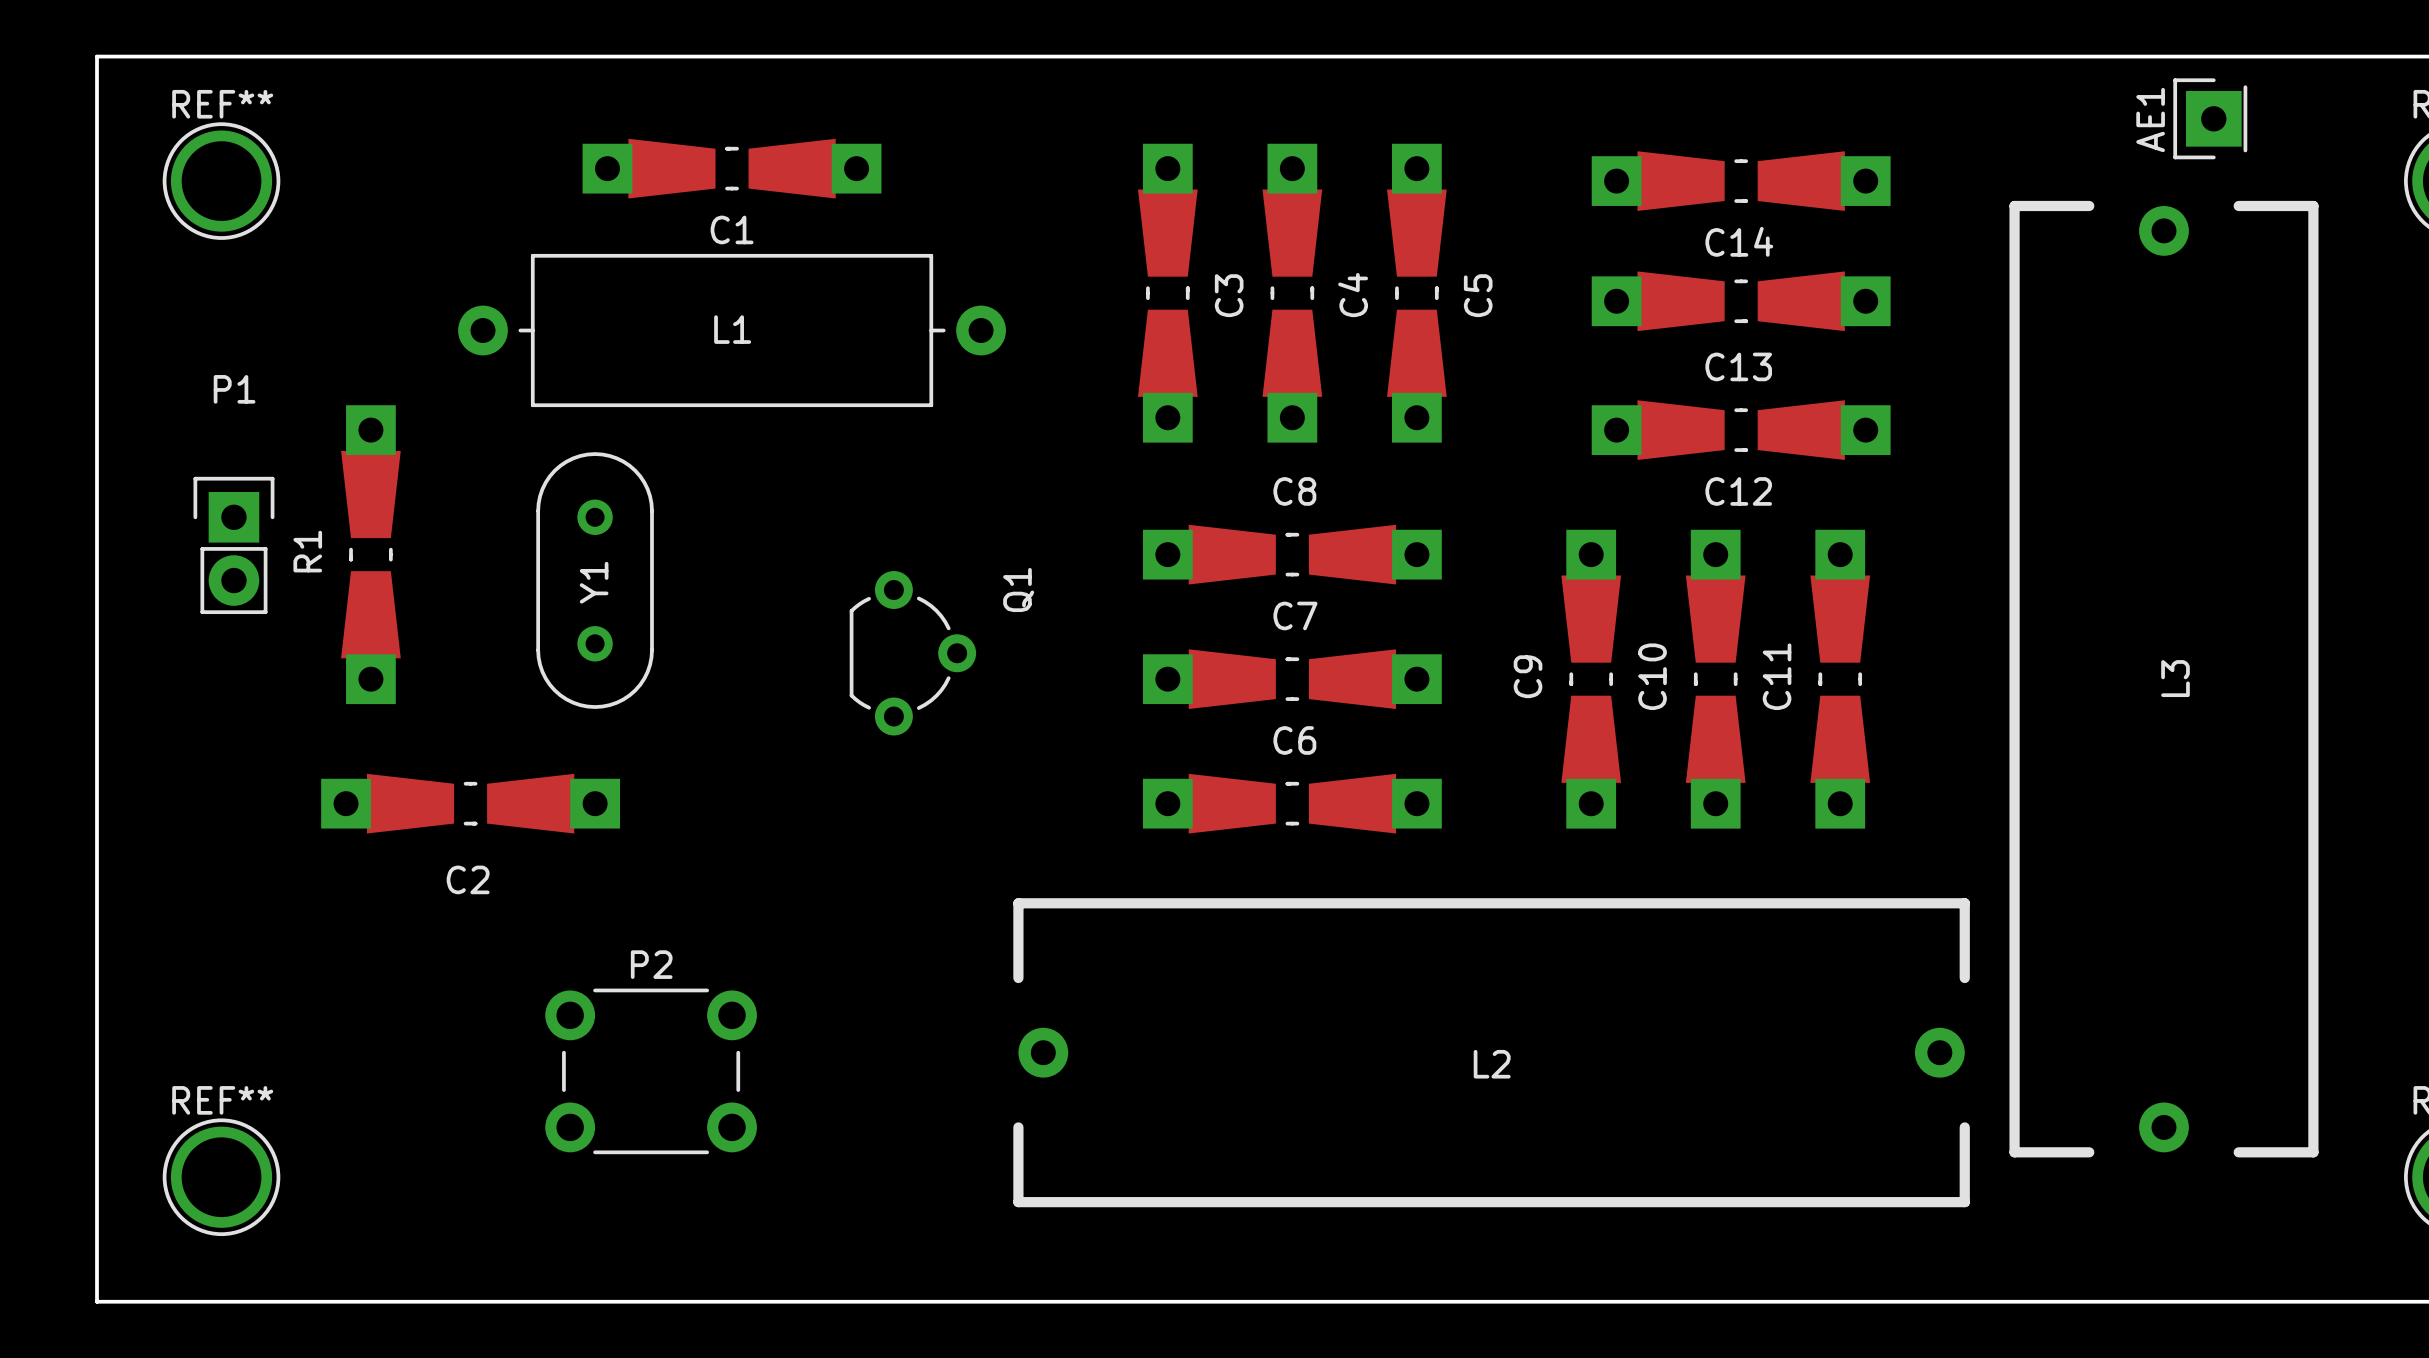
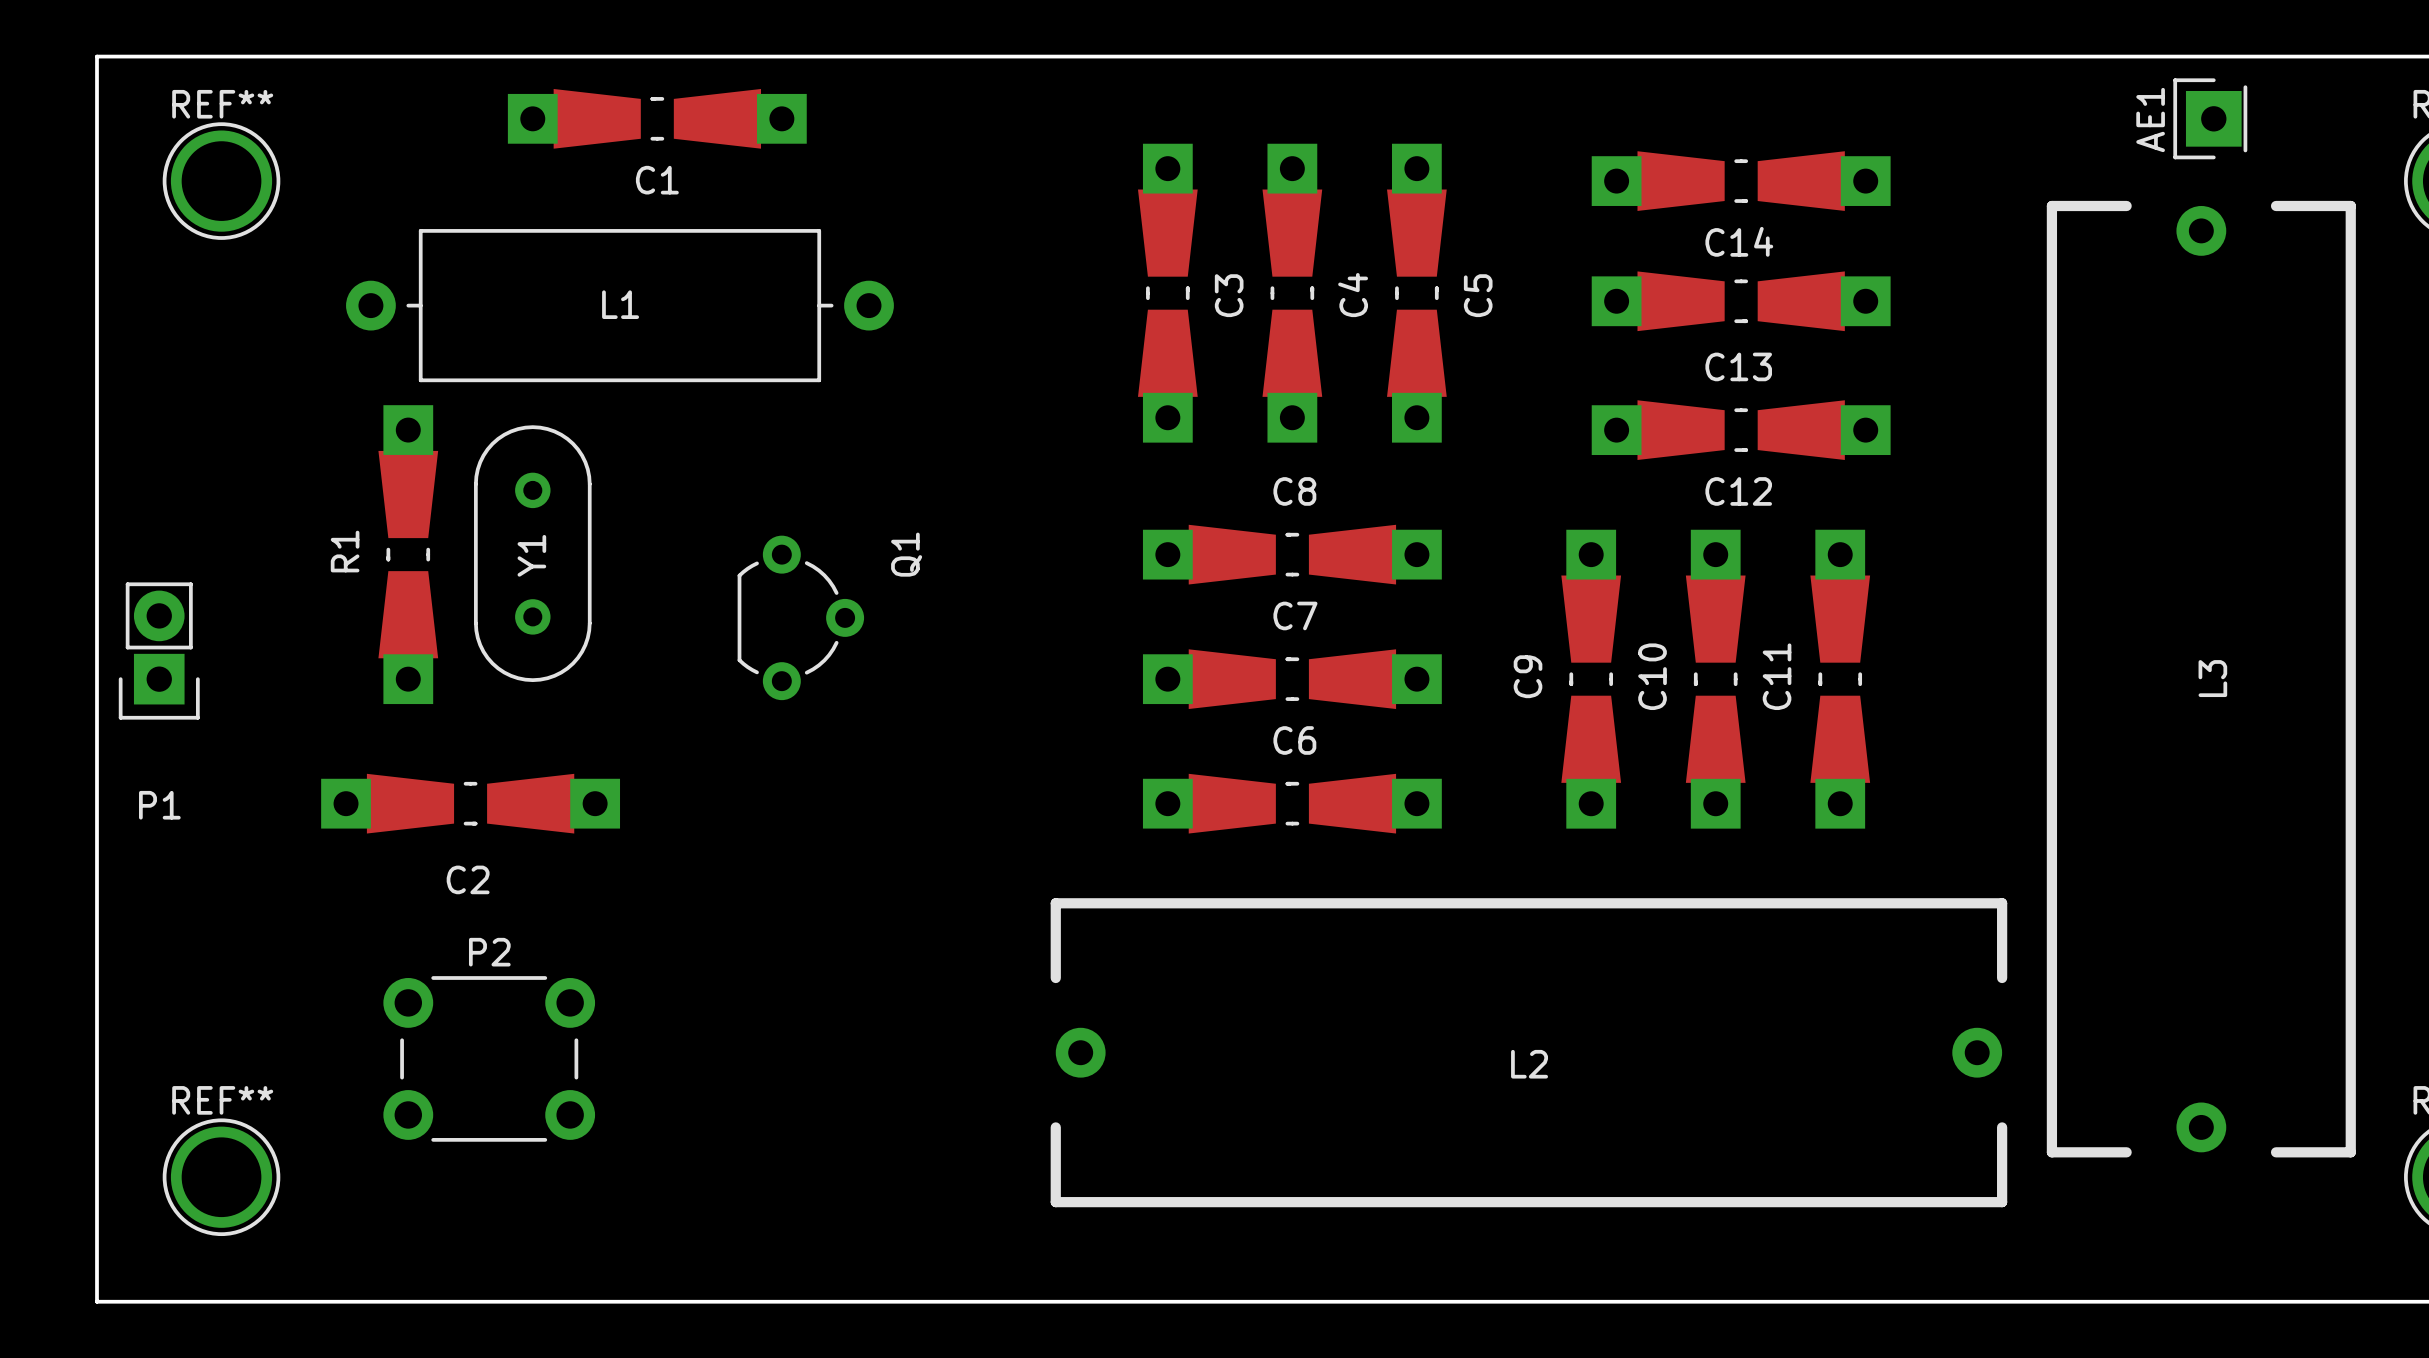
C1 position: (732, 168) -> (657, 118)
L1 position: (732, 330) -> (619, 305)
P1 rotation: 0° (233, 545) -> 180° (159, 651)
P1 position: (233, 545) -> (159, 651)
R1 position: (370, 554) -> (408, 554)
Y1 position: (595, 580) -> (532, 553)
Q1 position: (912, 653) -> (800, 617)
L3 position: (2163, 679) -> (2201, 679)
L2 position: (1491, 1052) -> (1528, 1052)
P2 position: (651, 1071) -> (489, 1058)

